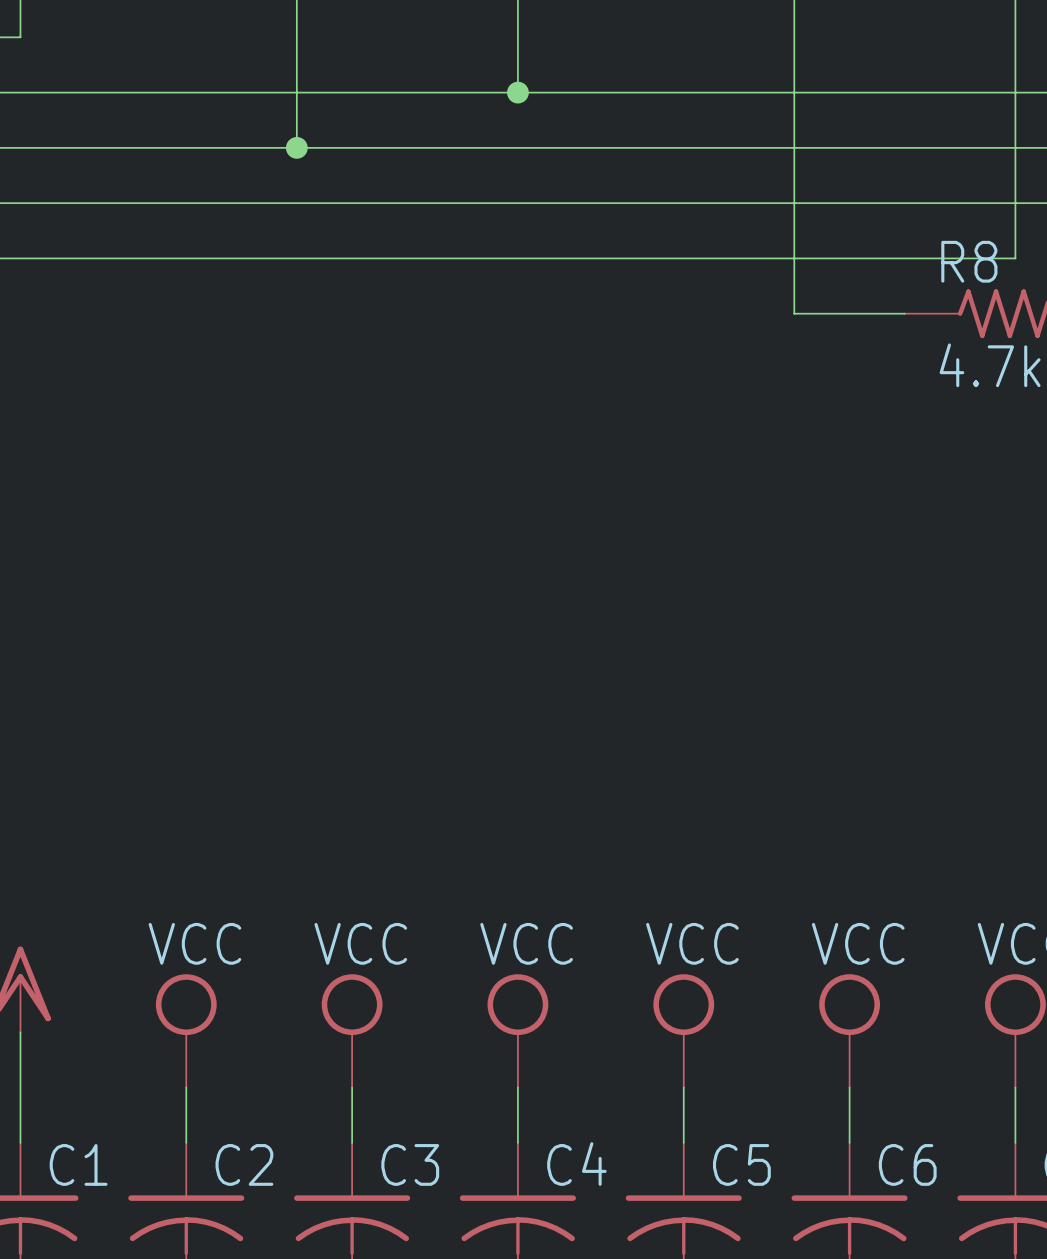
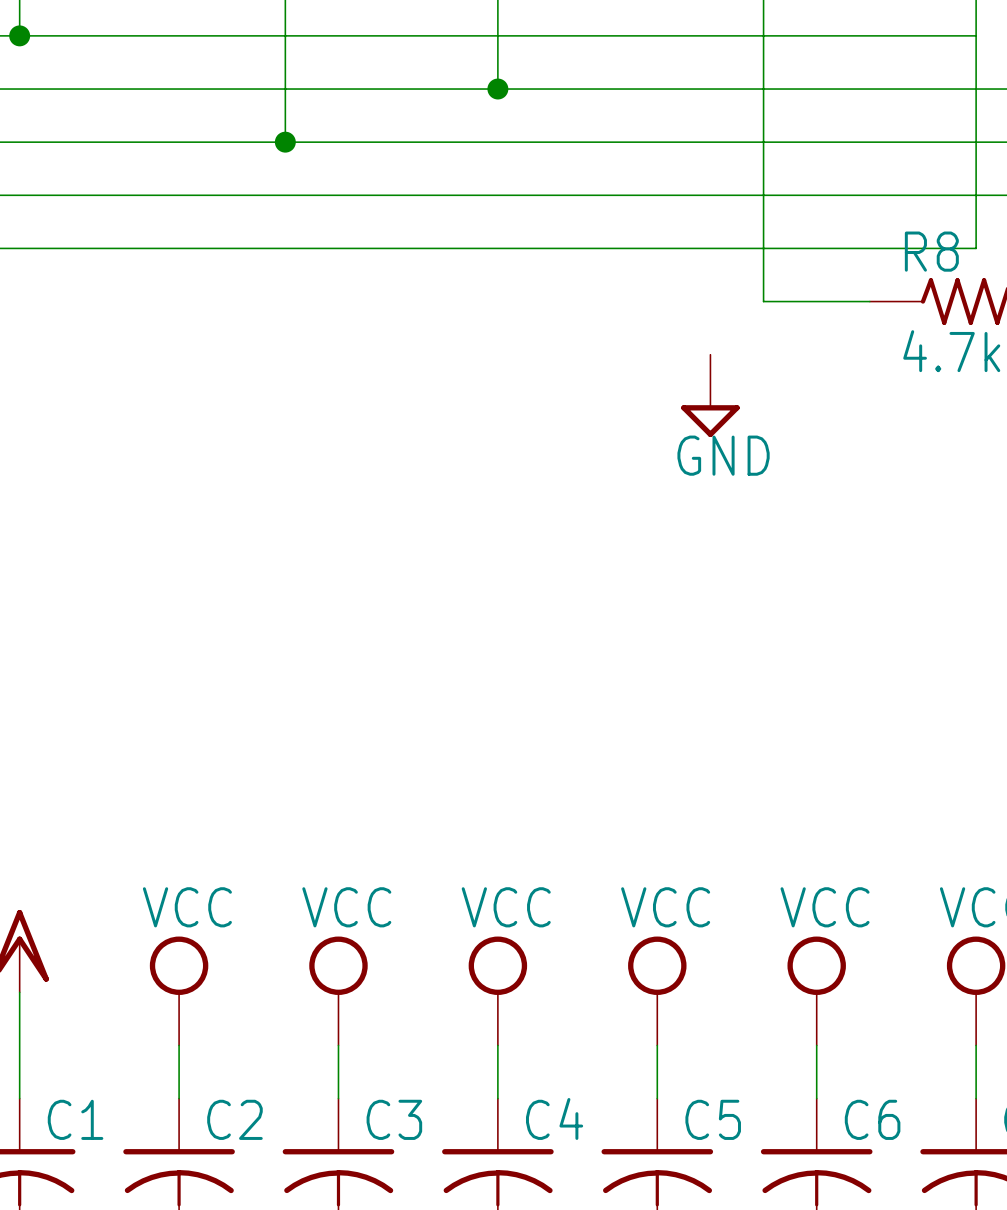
wire: none -> (19, 35) (976, 35)
junction: none -> (19, 35)
power symbol: none -> GND (710, 395)

